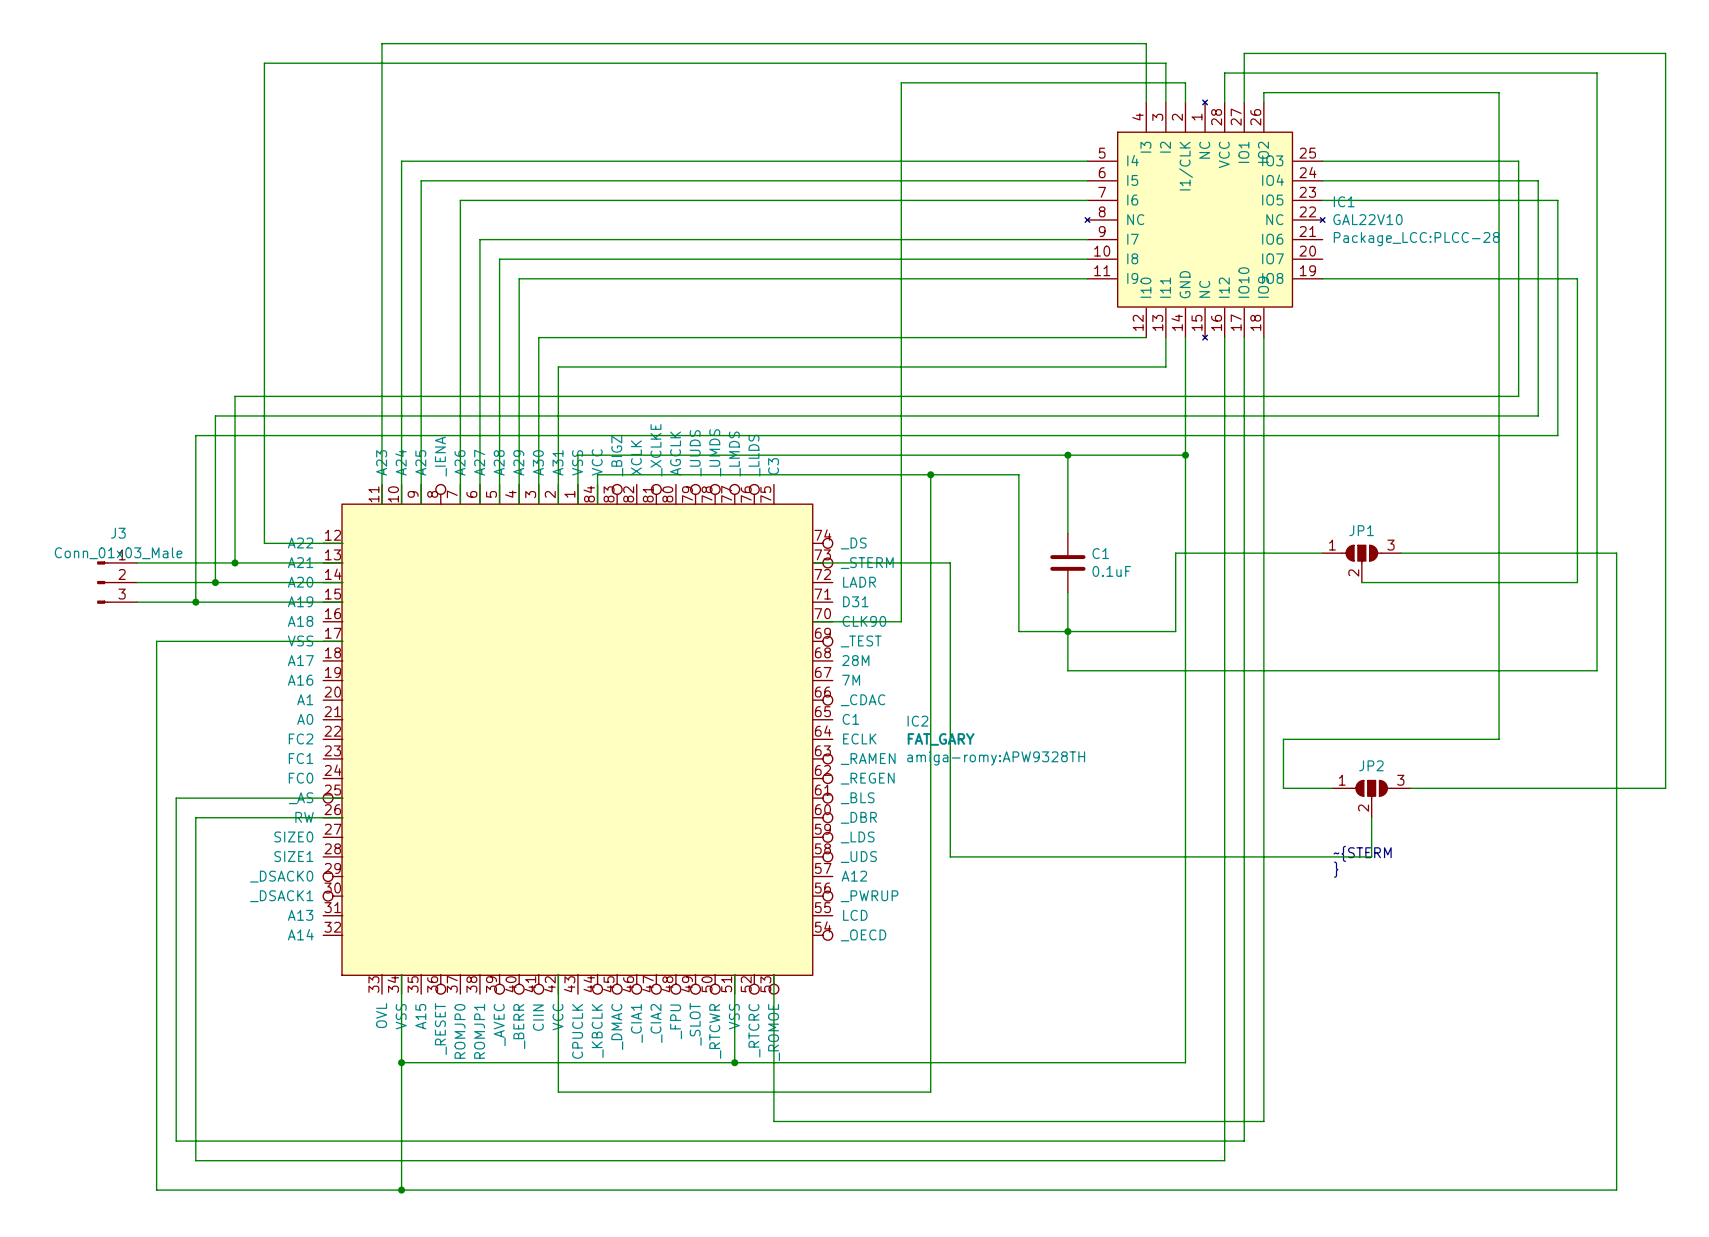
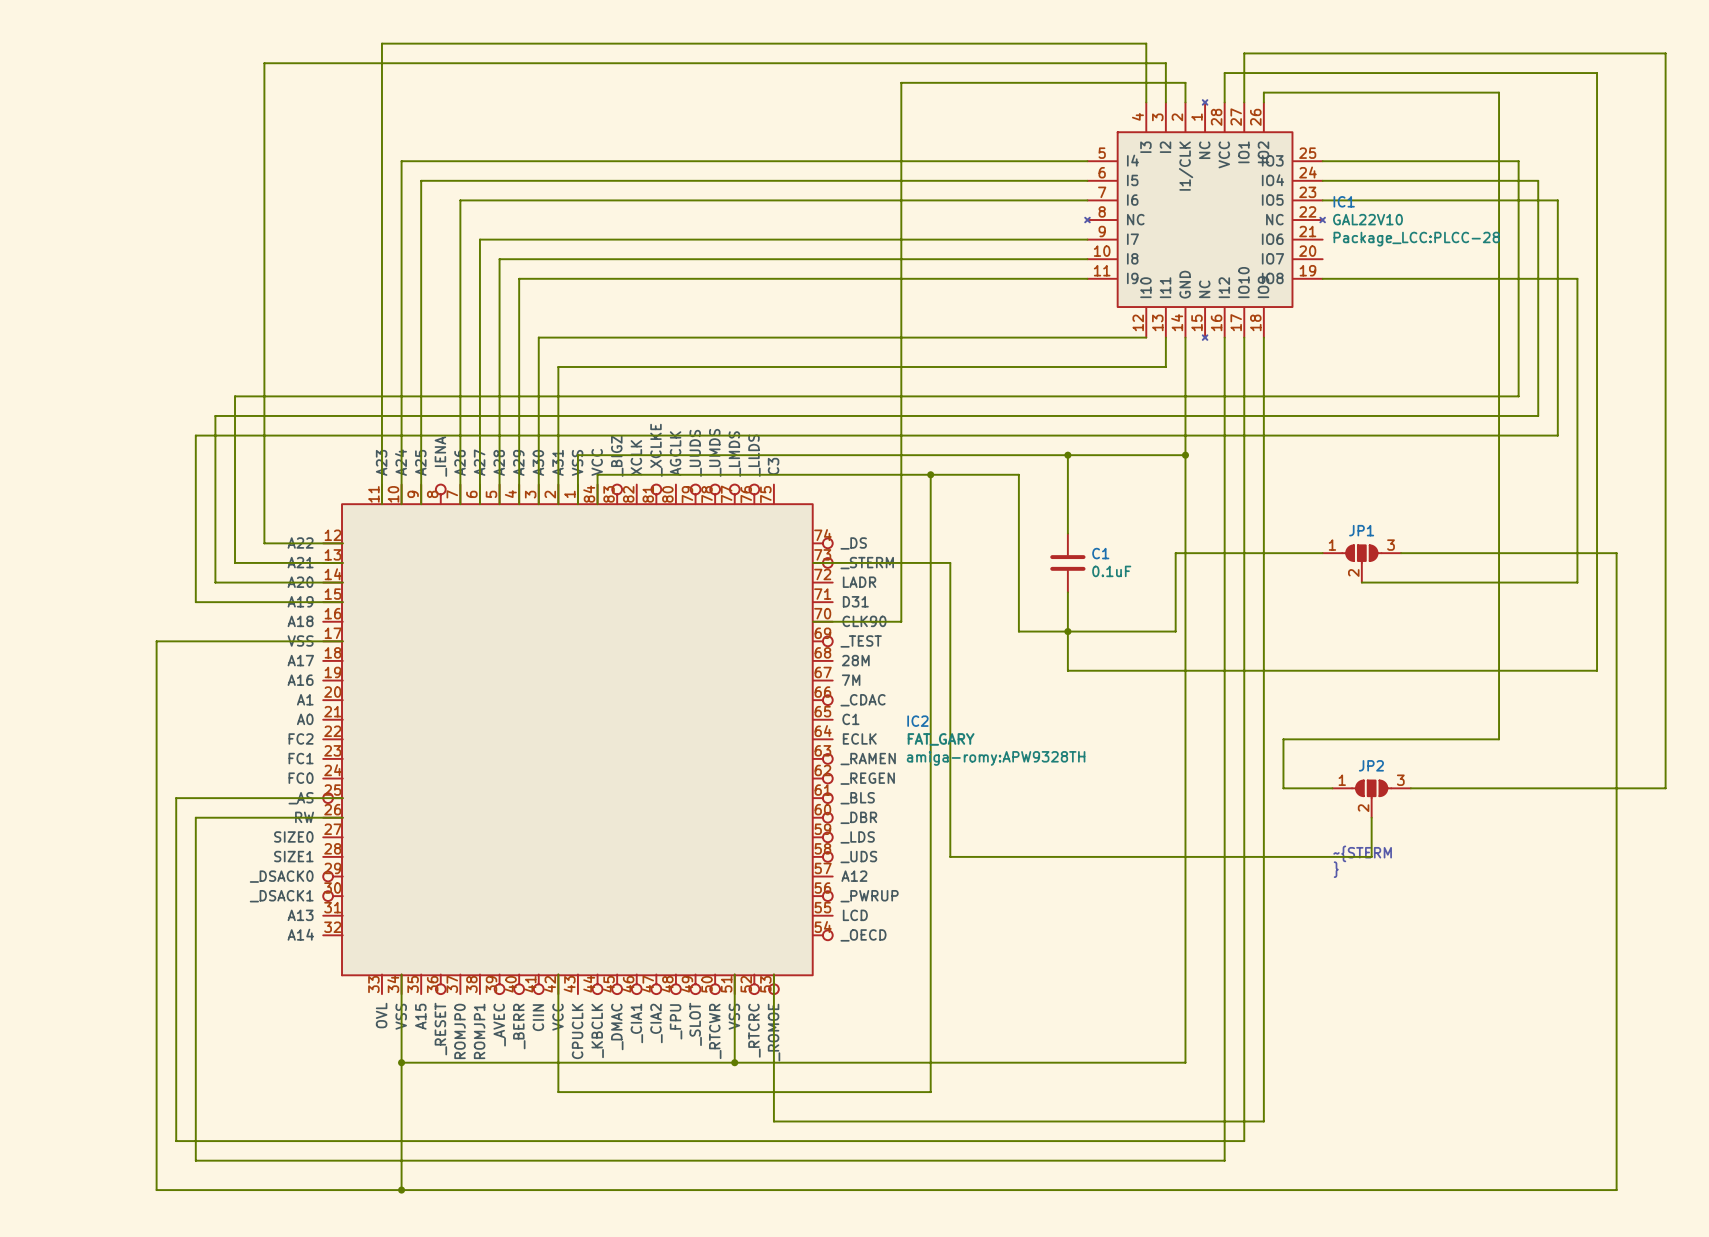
wire: (137, 562) (235, 562) -> none
junction: (235, 562) -> none
J3: Conn_01x03_Male (117, 582) -> none
wire: (137, 582) (215, 582) -> none
junction: (215, 582) -> none
wire: (137, 602) (195, 602) -> none
junction: (195, 602) -> none

